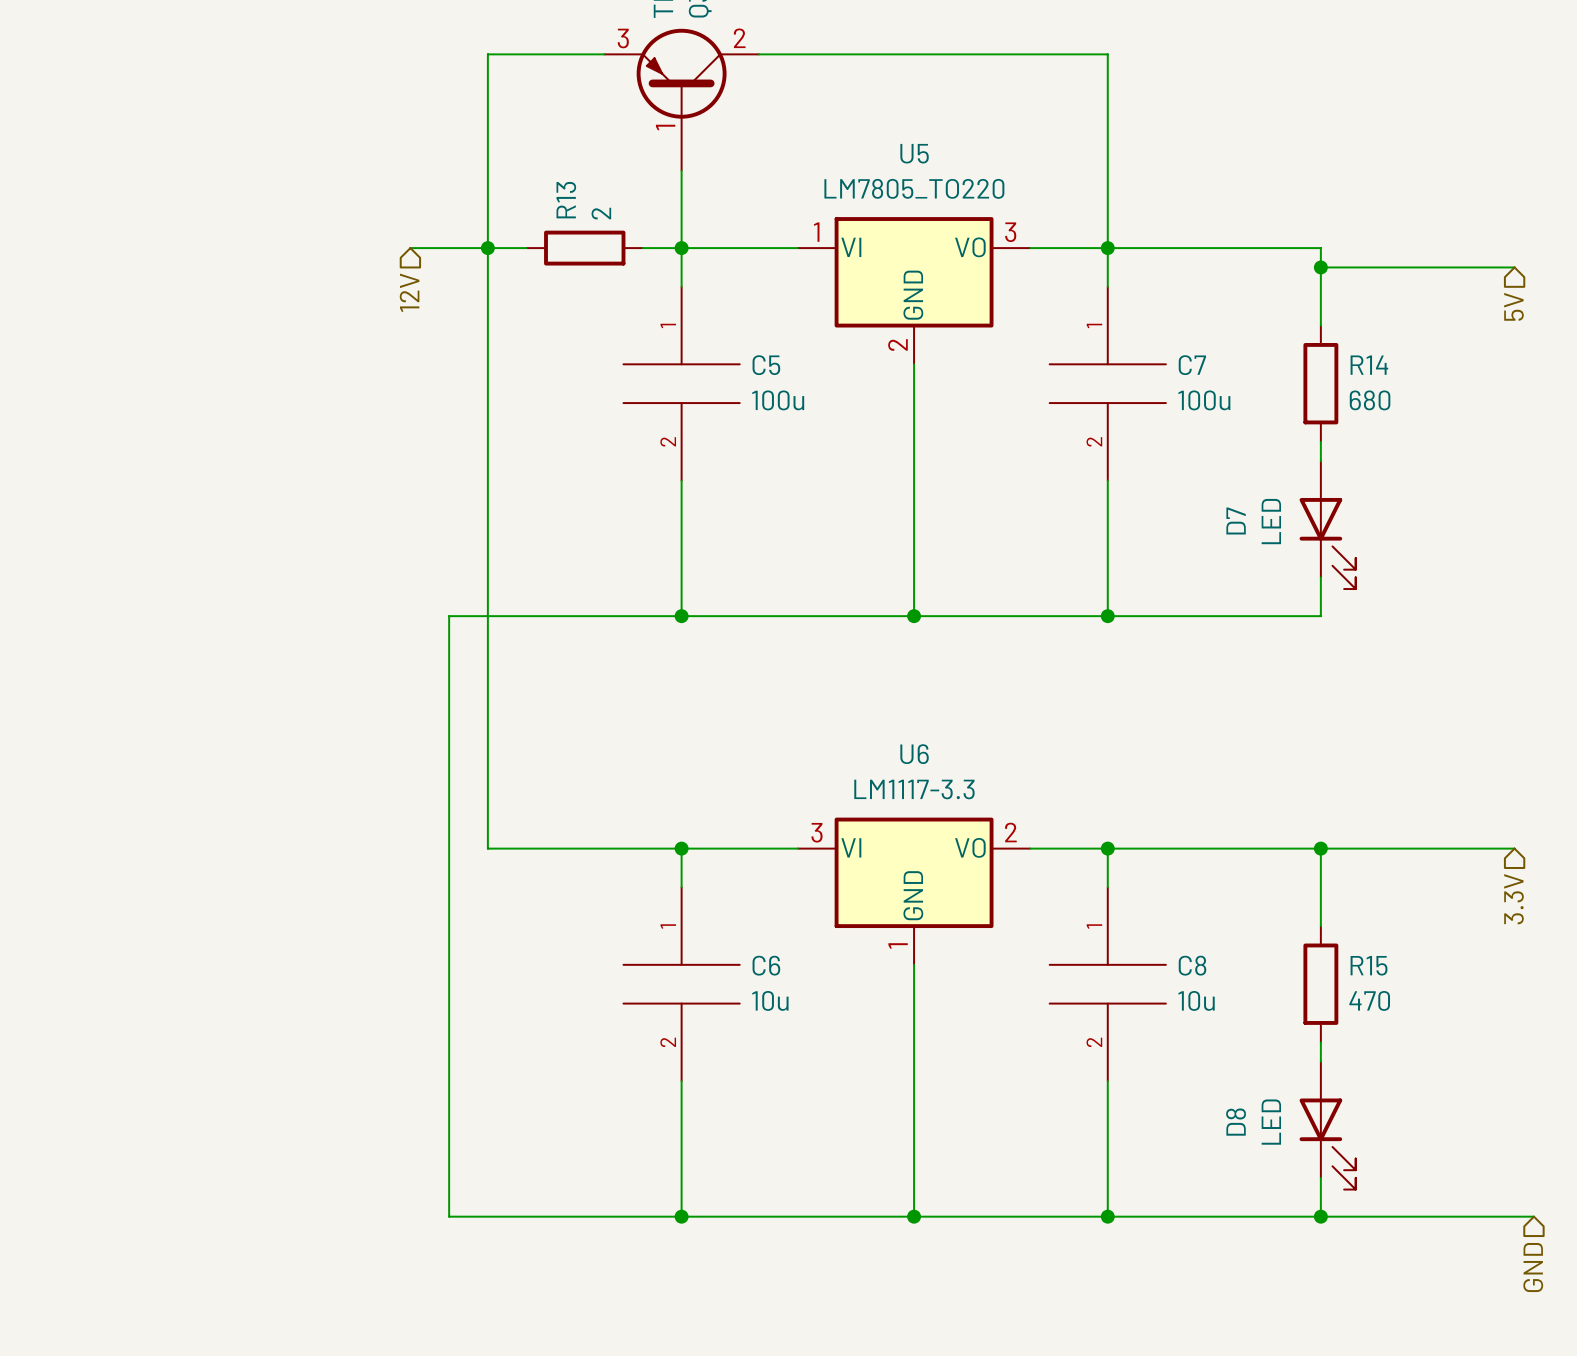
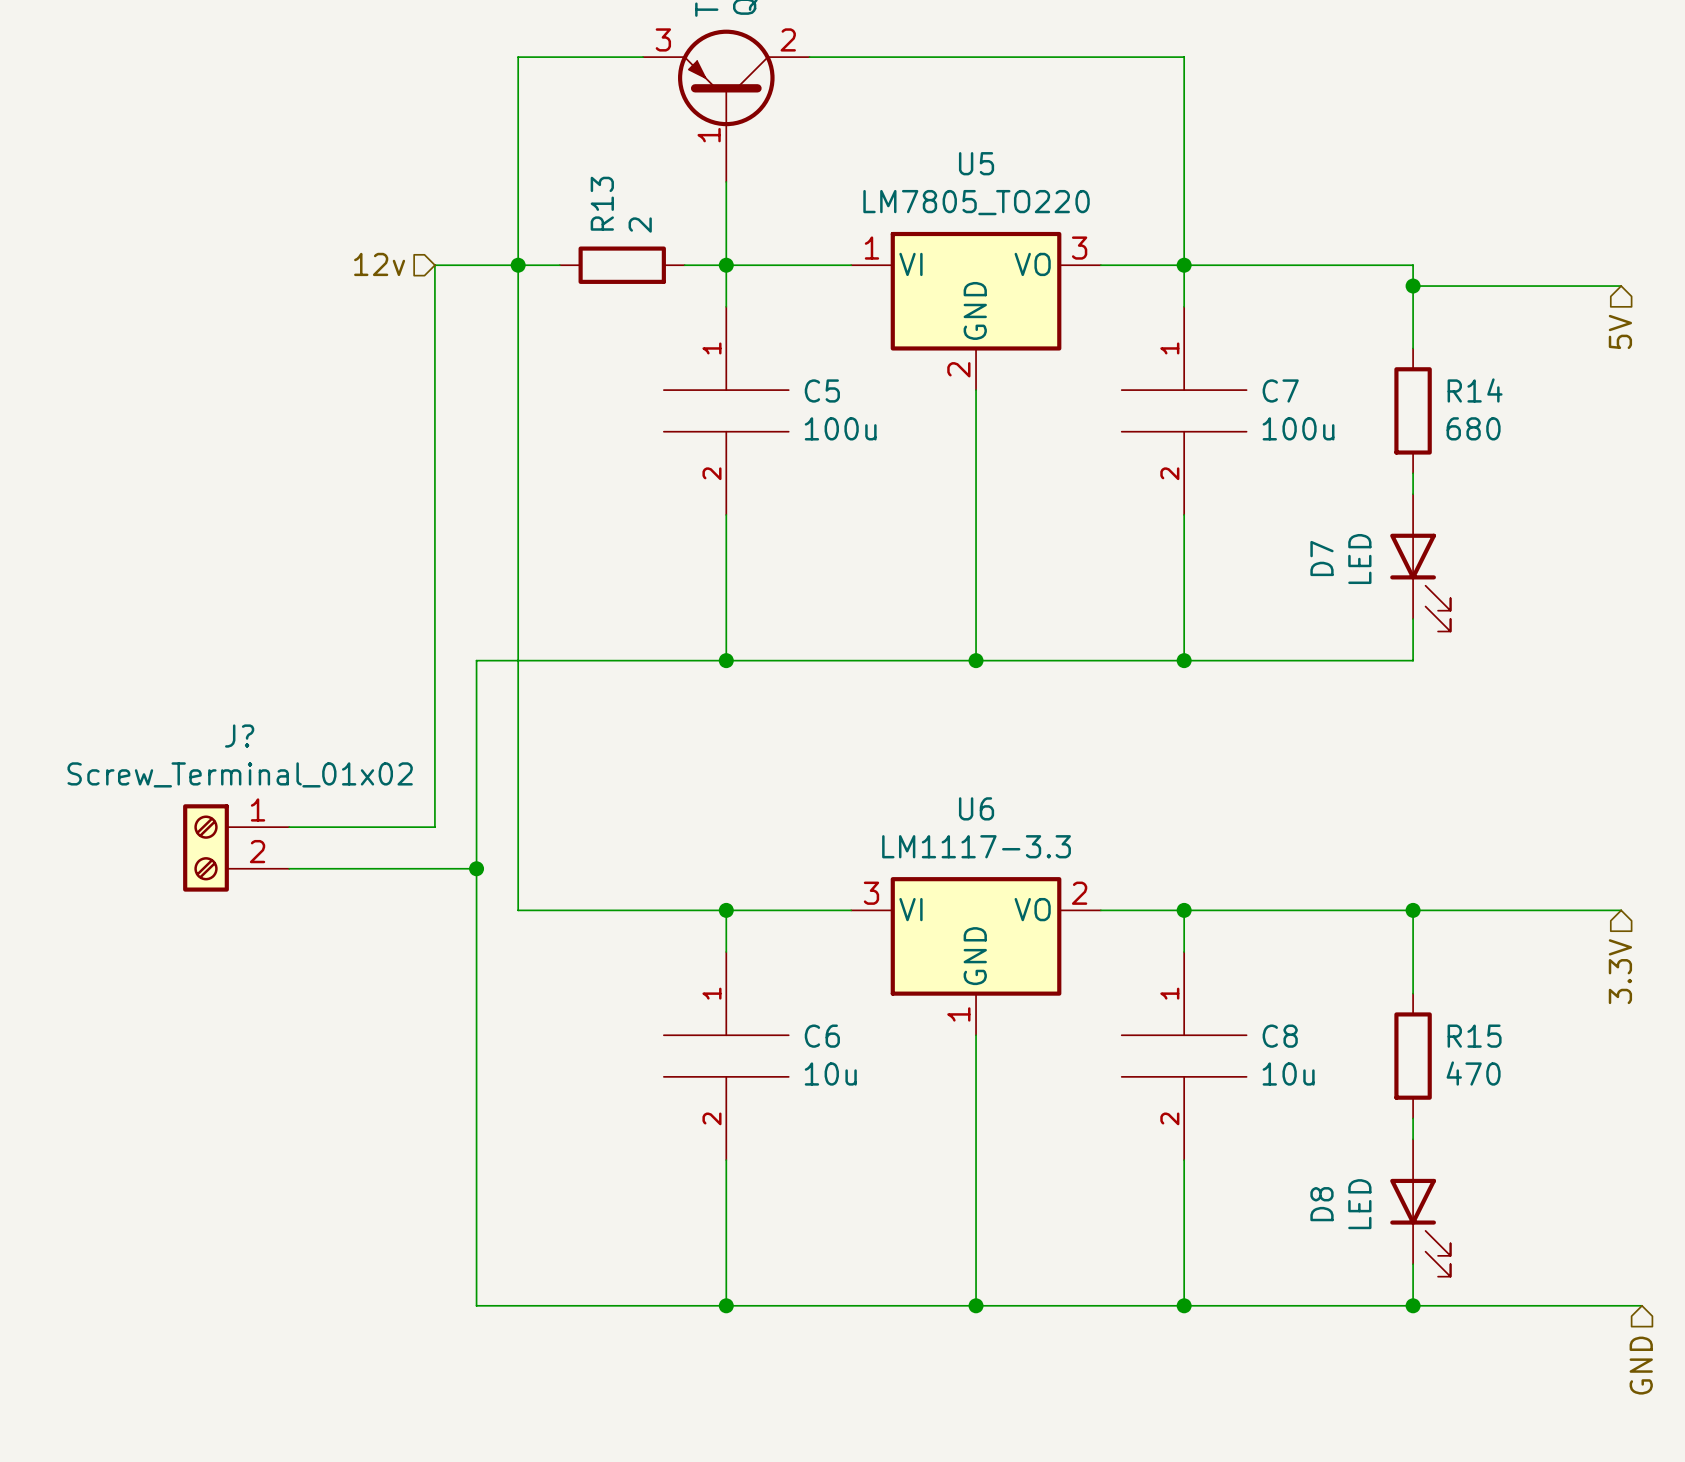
hierarchical label: none -> 12v (379, 264)
wire: none -> (434, 265) (434, 827) (289, 827)
hierarchical label: 12V (409, 292) -> none
J?: none -> Screw_Terminal_01x02 (236, 847)
wire: none -> (289, 868) (476, 868)
junction: none -> (476, 868)

